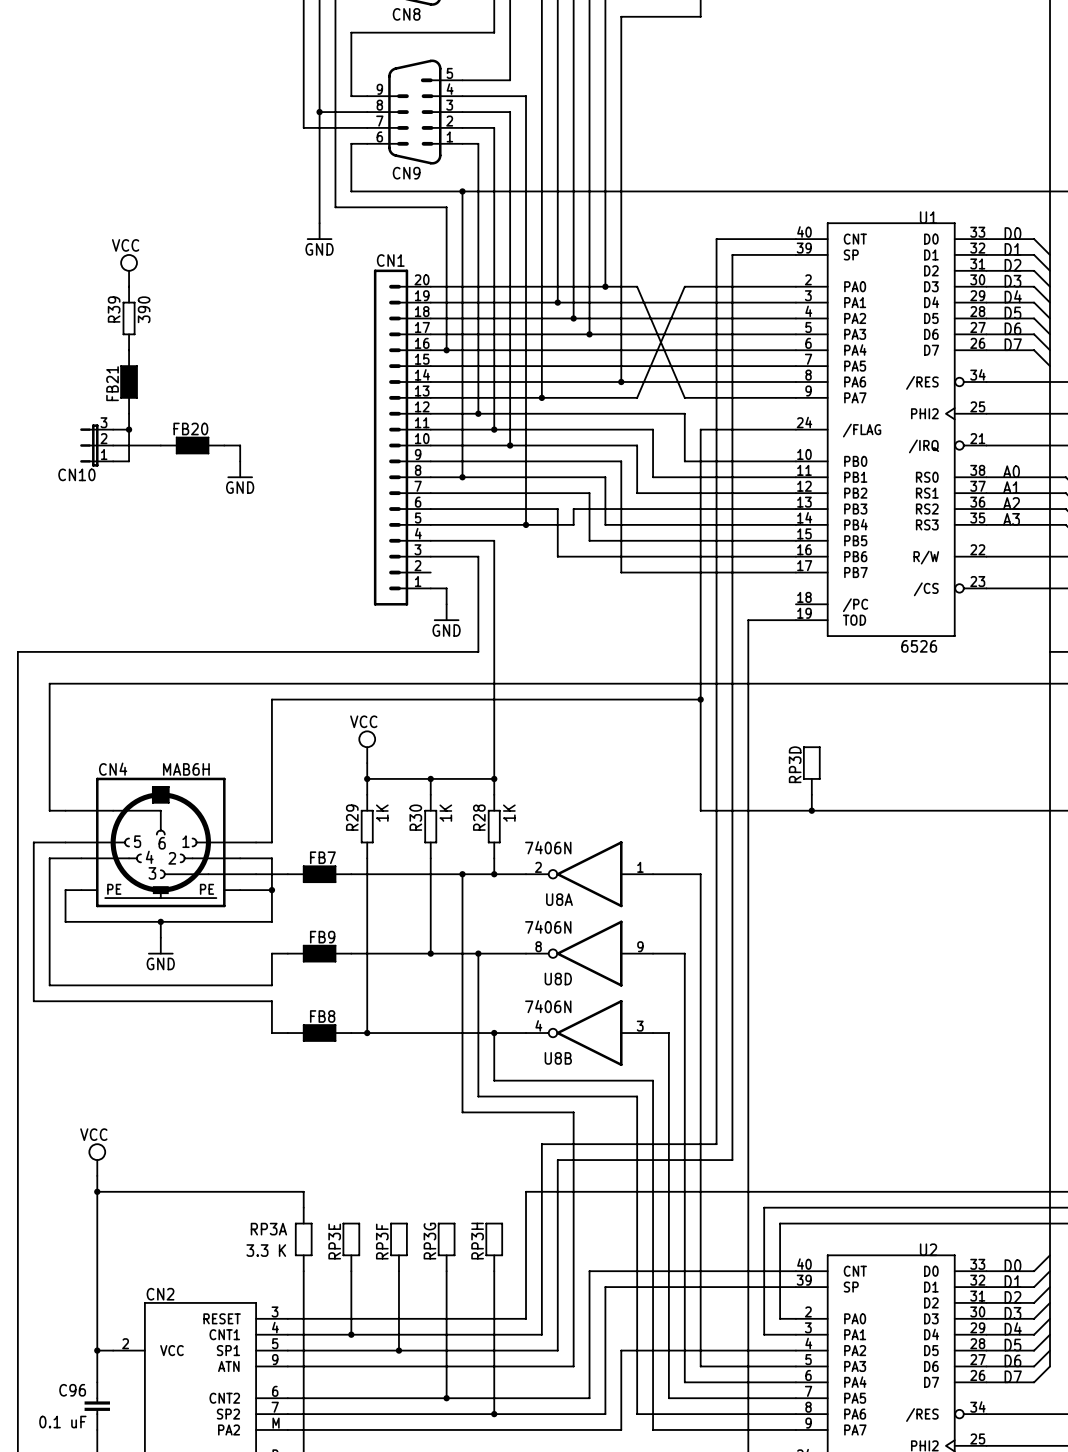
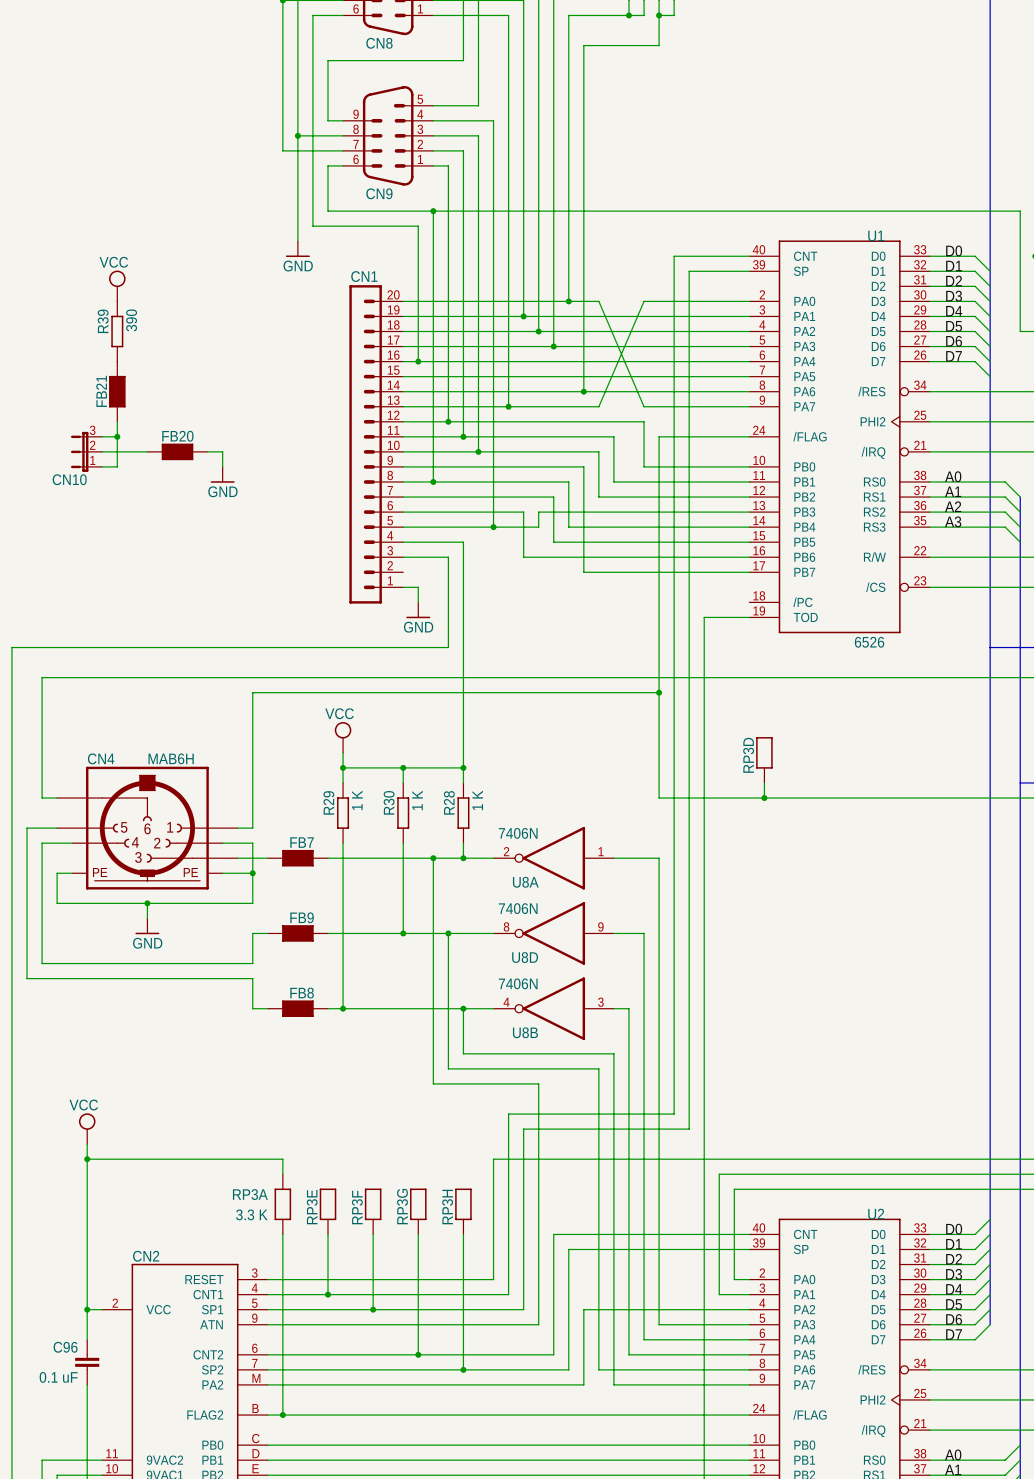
R29 value: 1K (382, 813) -> 1 K (357, 800)
R30 value: 1K (445, 813) -> 1 K (417, 800)
R28 value: 1K (509, 813) -> 1 K (477, 800)

